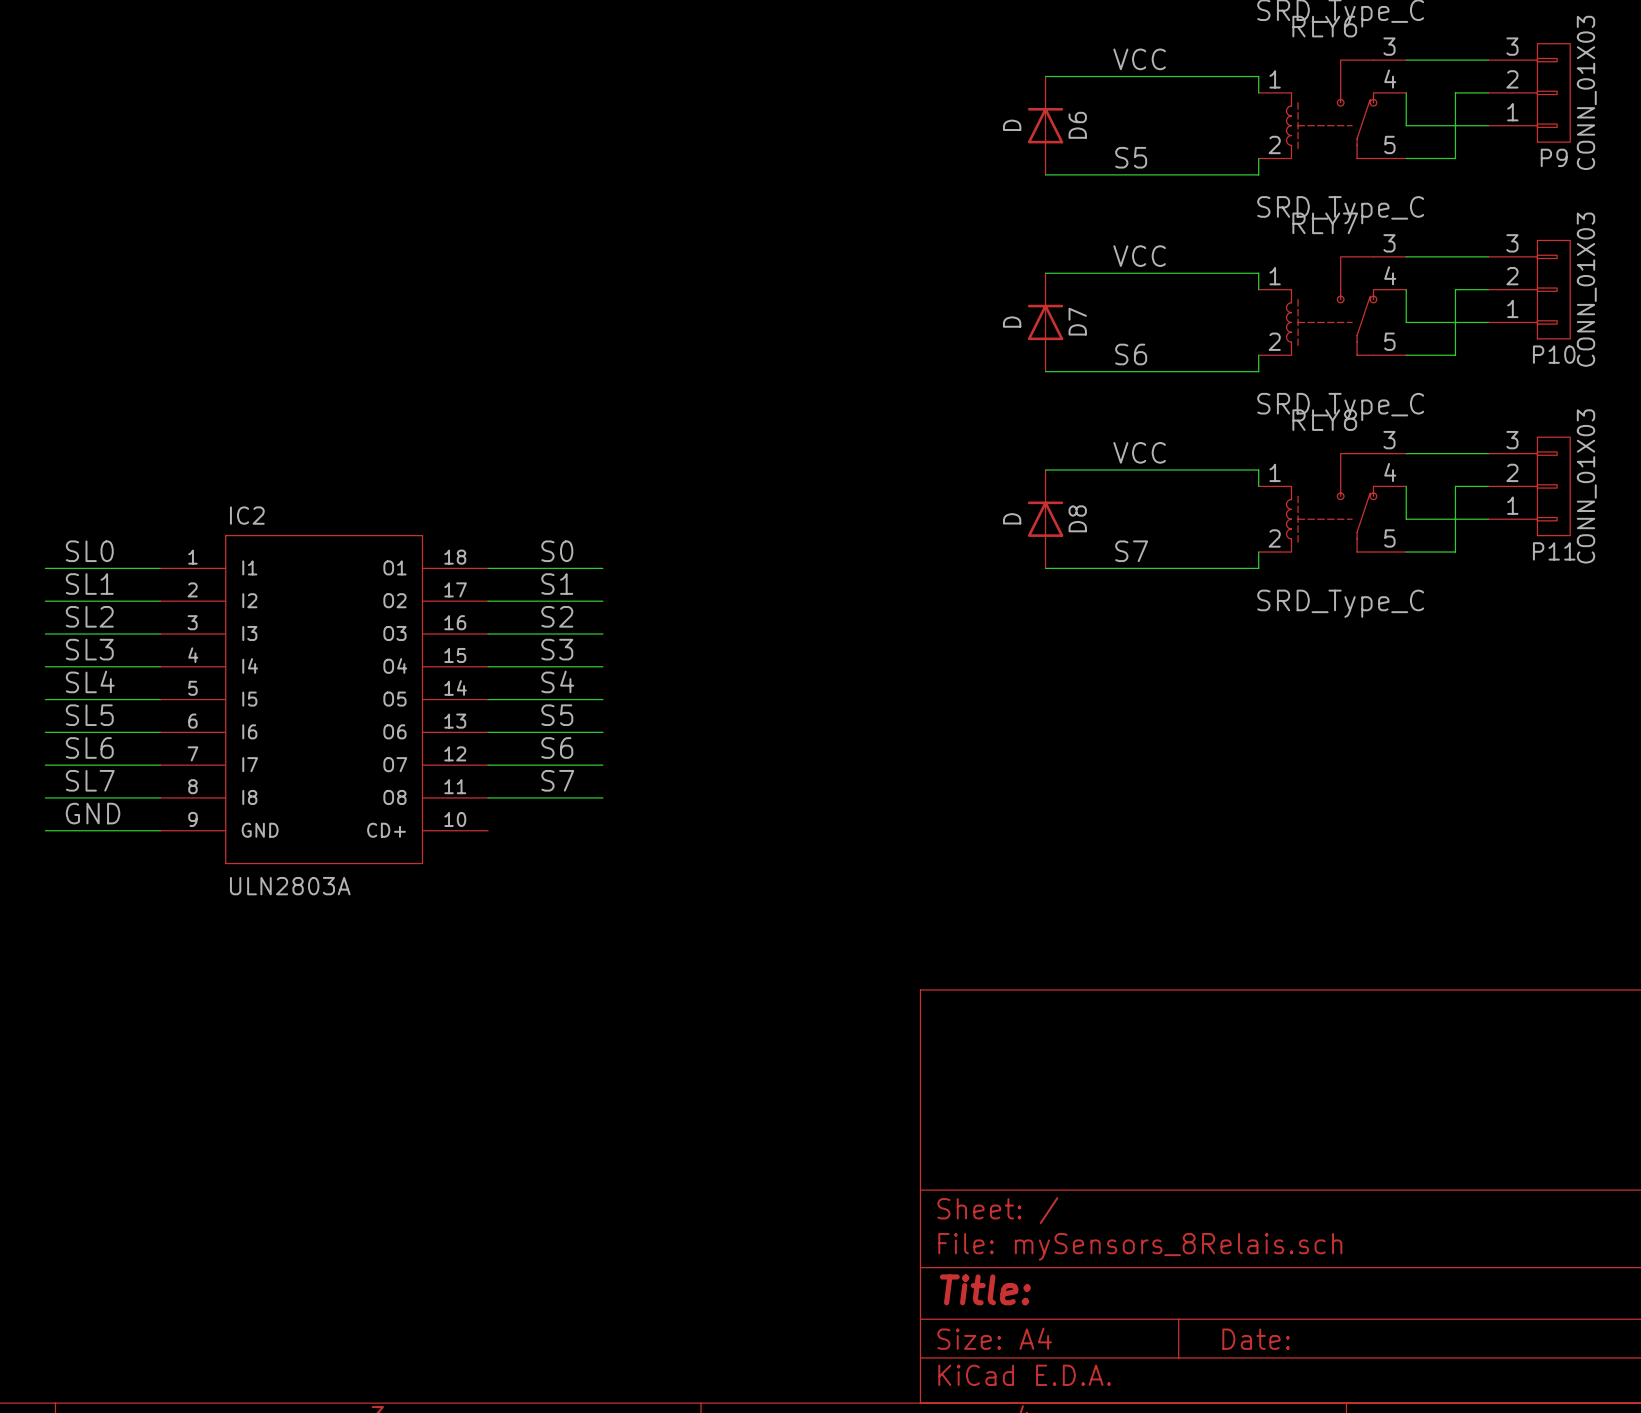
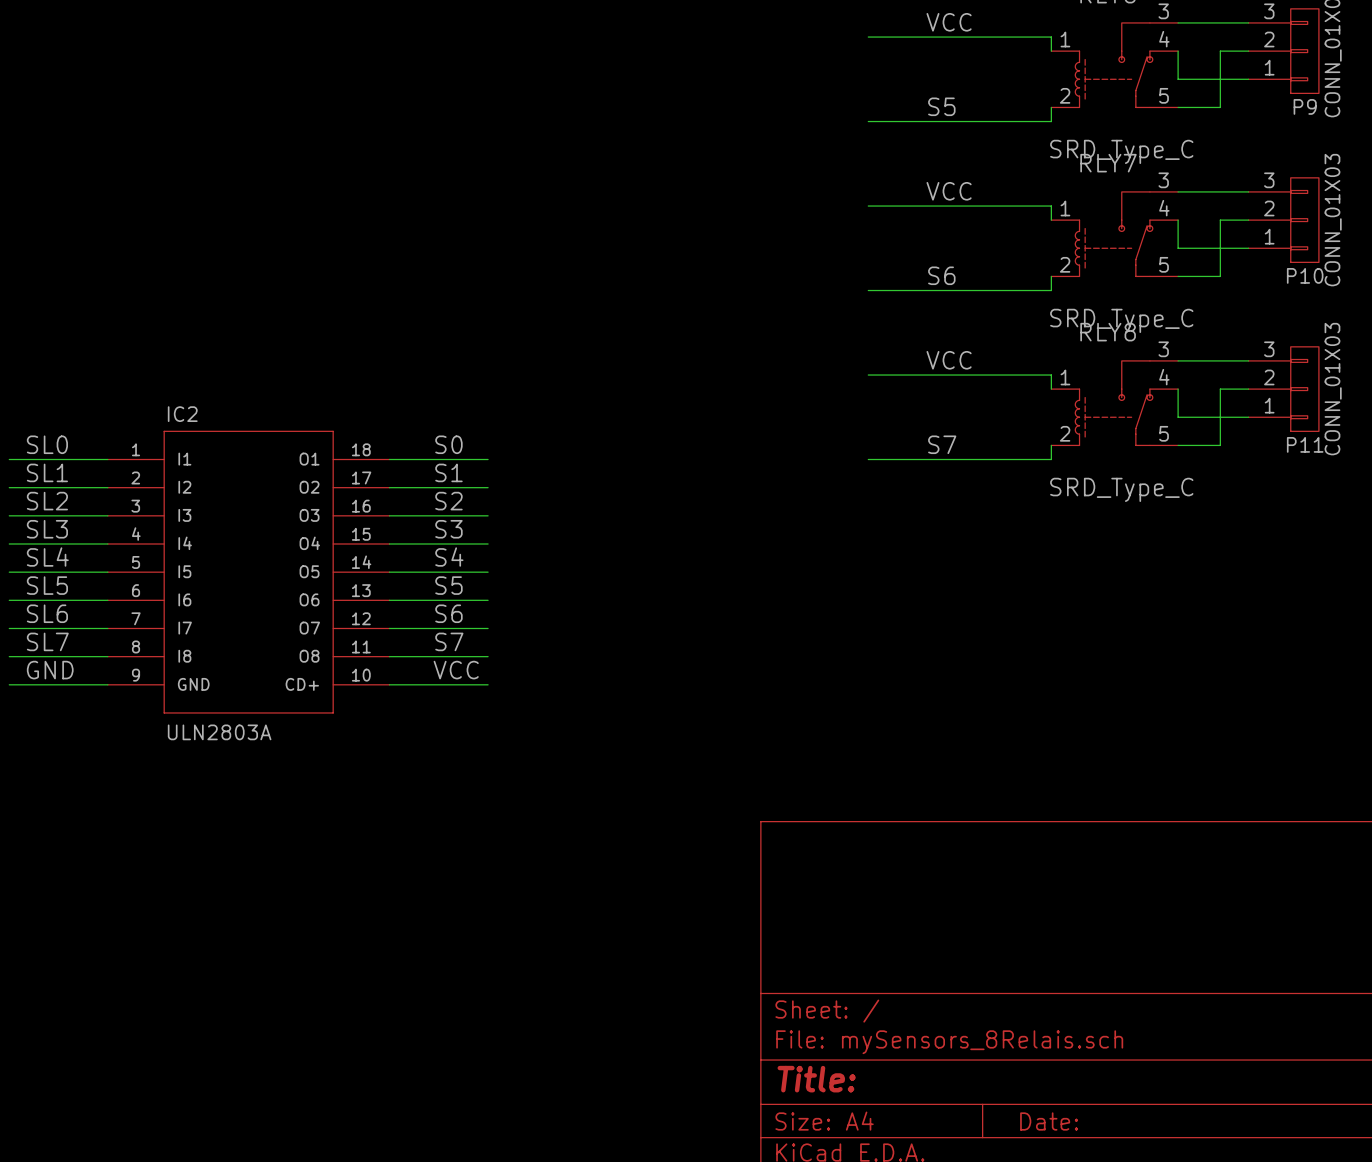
D6: D (1045, 125) -> none
D7: D (1045, 322) -> none
D8: D (1045, 519) -> none
label: none -> VCC (456, 670)
wire: none -> (389, 684) (488, 684)

